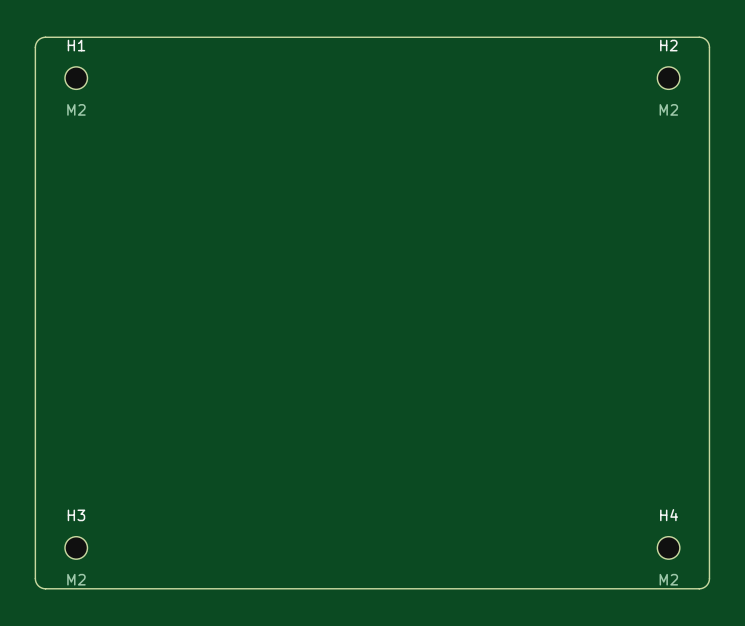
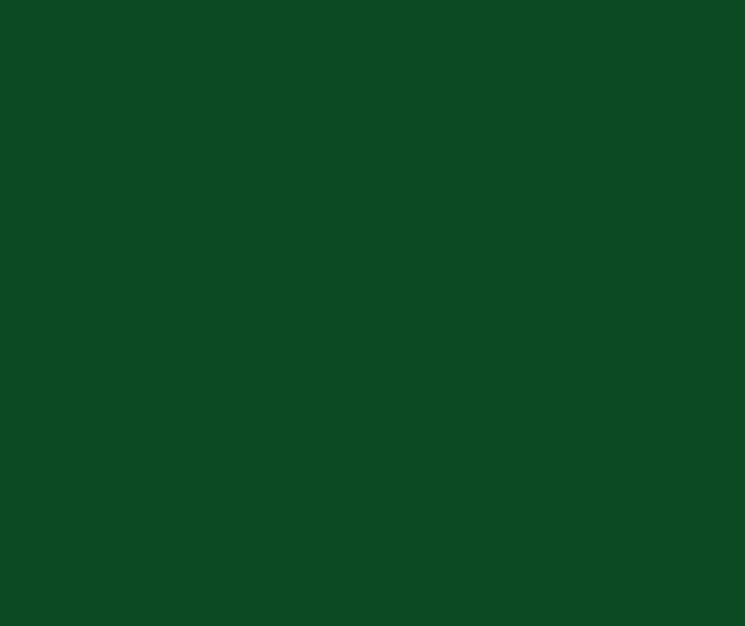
board edge: (45, 37) (699, 37) (705, 39) (709, 47) (709, 578) (707, 584) (699, 588) (45, 588) (39, 586) (35, 578) (35, 47) (38, 40) (45, 37) -> none
H1: M2 (76, 78) -> none
H2: M2 (668, 78) -> none
H3: M2 (76, 547) -> none
H4: M2 (668, 547) -> none

